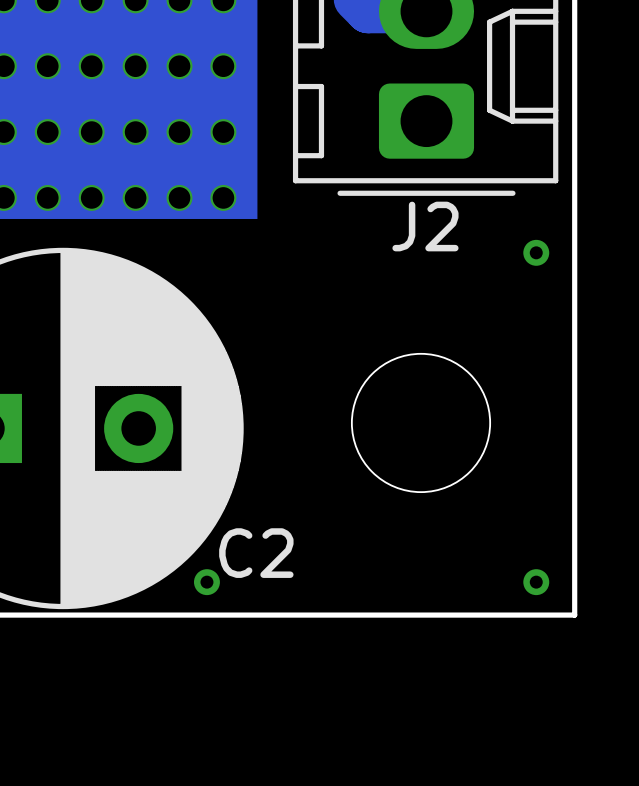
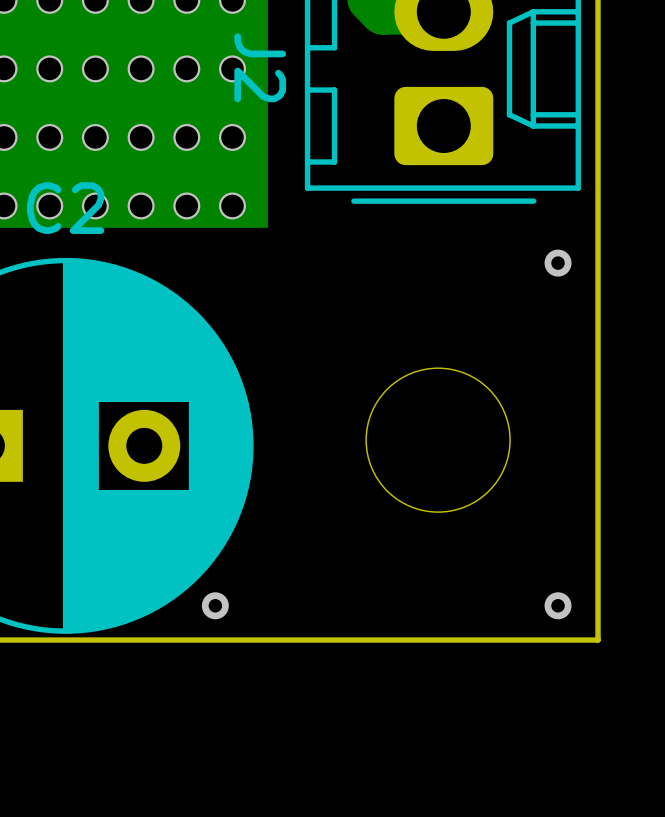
J2 name rotation: 0° (425, 226) -> 90° clockwise (260, 67)
J2 name position: J2 (425, 226) -> J2 (260, 67)
C2 name position: C2 (256, 553) -> C2 (65, 208)

